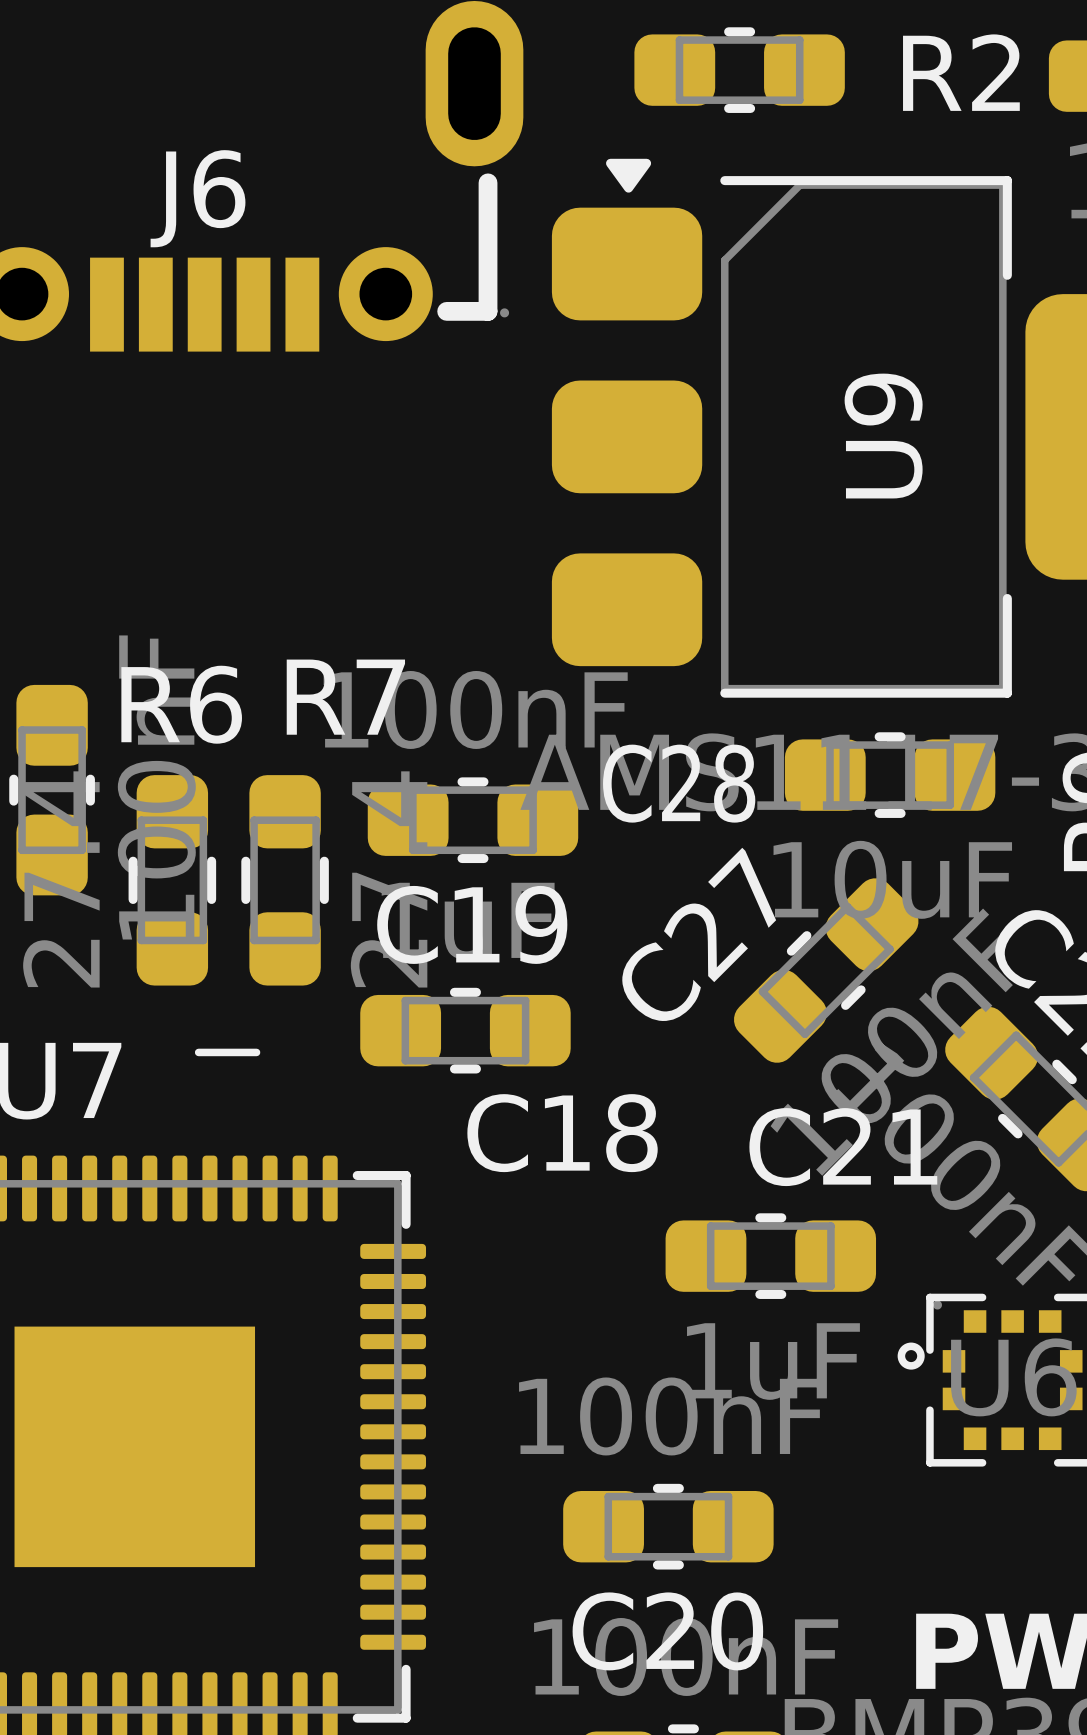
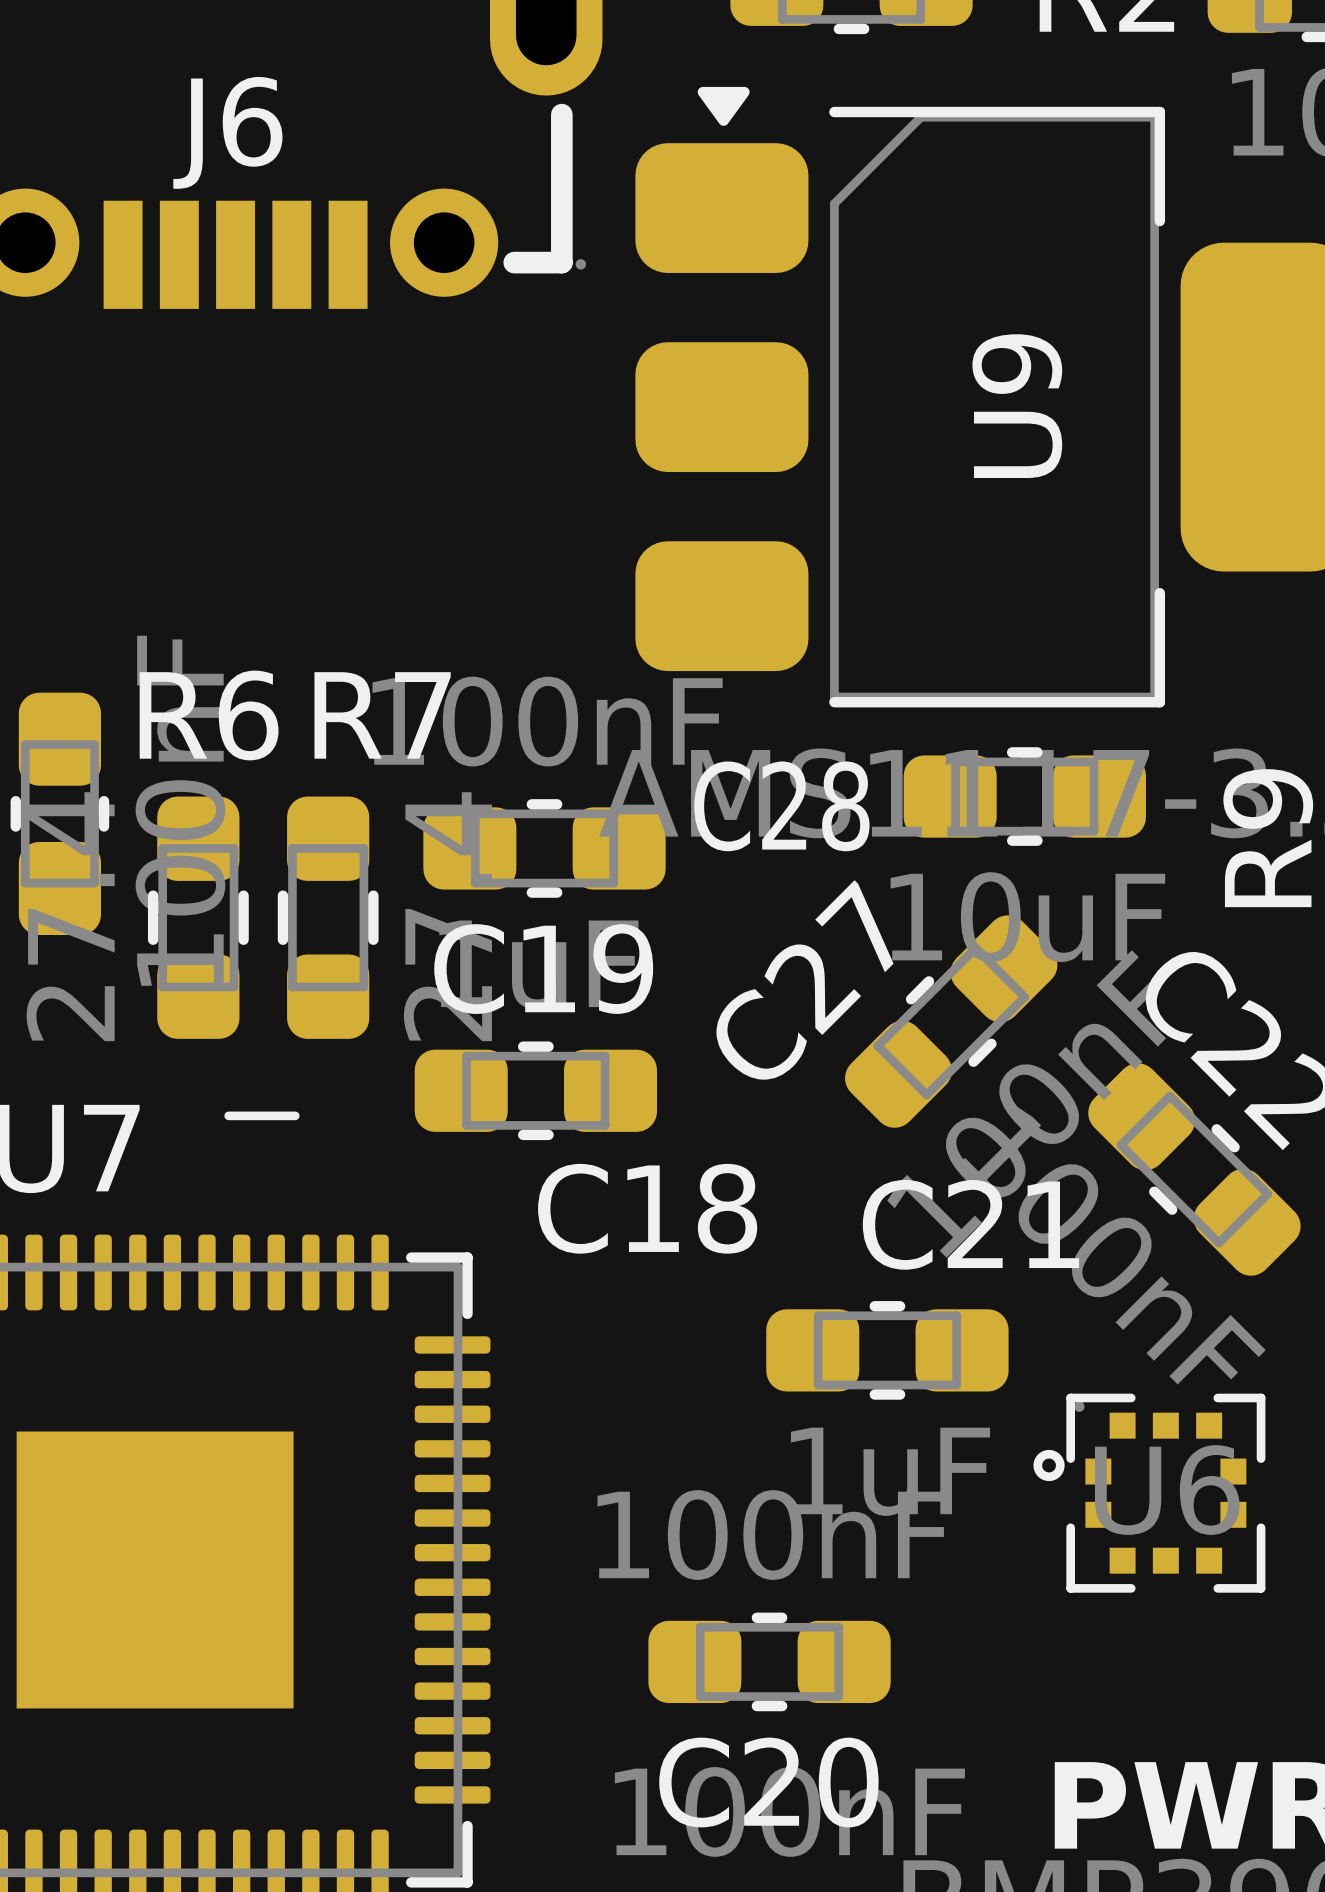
R7 name position: R7 (345, 697) -> R7 (382, 715)

